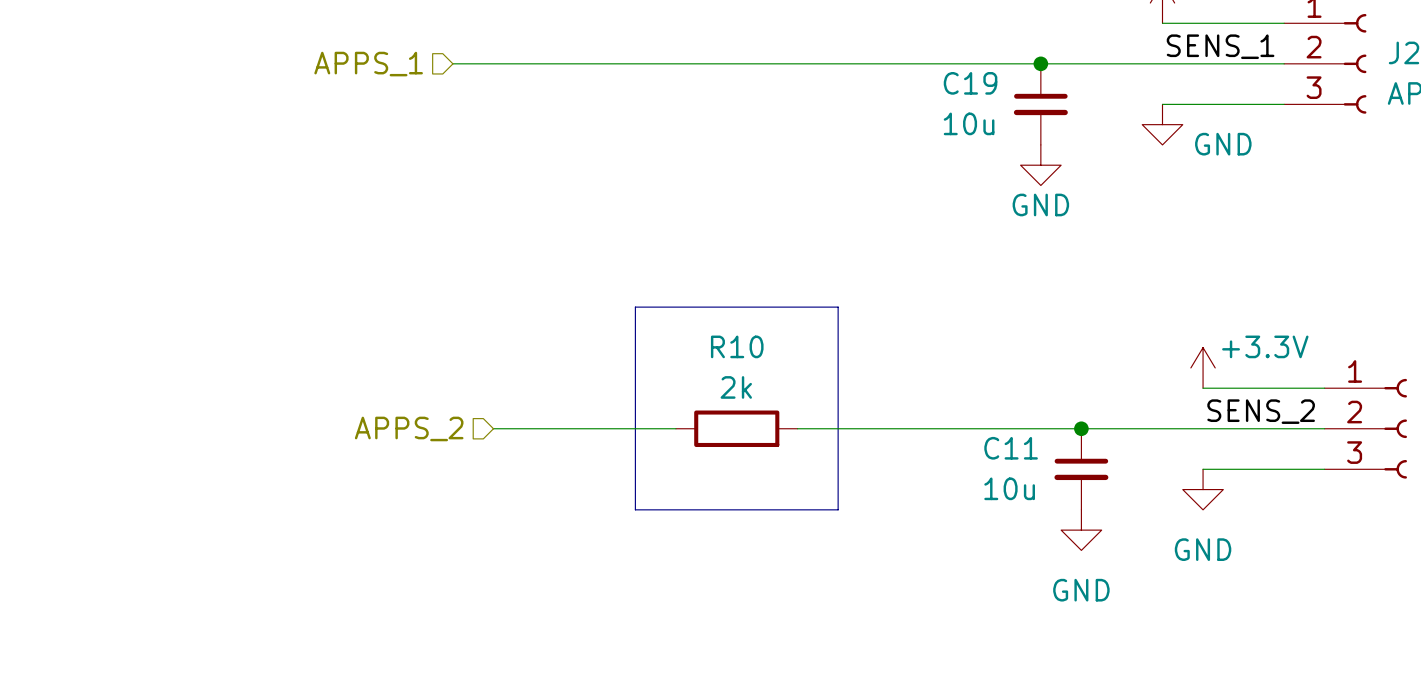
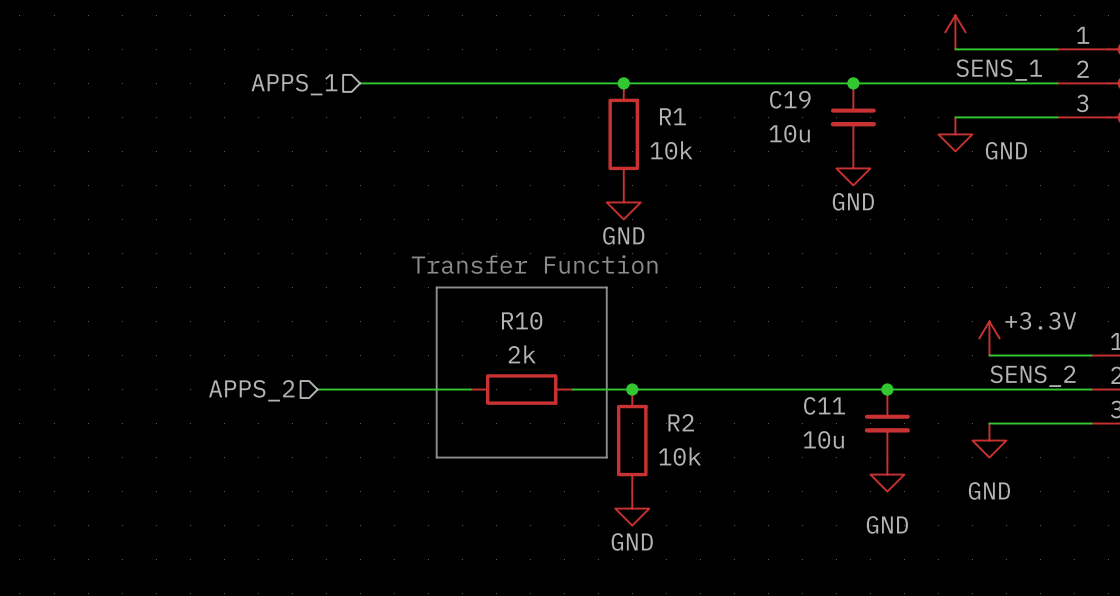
junction: none -> (623, 83)
R1: none -> 10k (623, 134)
power symbol: none -> GND (623, 202)
text: none -> Transfer Function (534, 264)
line: (635, 307) (635, 509) -> (513, 287) (436, 287) (436, 457) (513, 457)
line: (746, 307) (838, 307) (838, 509) (746, 509) -> (606, 287) (606, 457)
wire: none -> (317, 389) (394, 389)
hierarchical label position: APPS_2 (409, 428) -> APPS_2 (251, 390)
wire: (584, 428) (675, 428) -> (572, 389) (649, 389)
R10 position: (736, 428) -> (521, 389)
junction: none -> (632, 389)
R2: none -> 10k (632, 440)
power symbol: none -> GND (632, 508)

